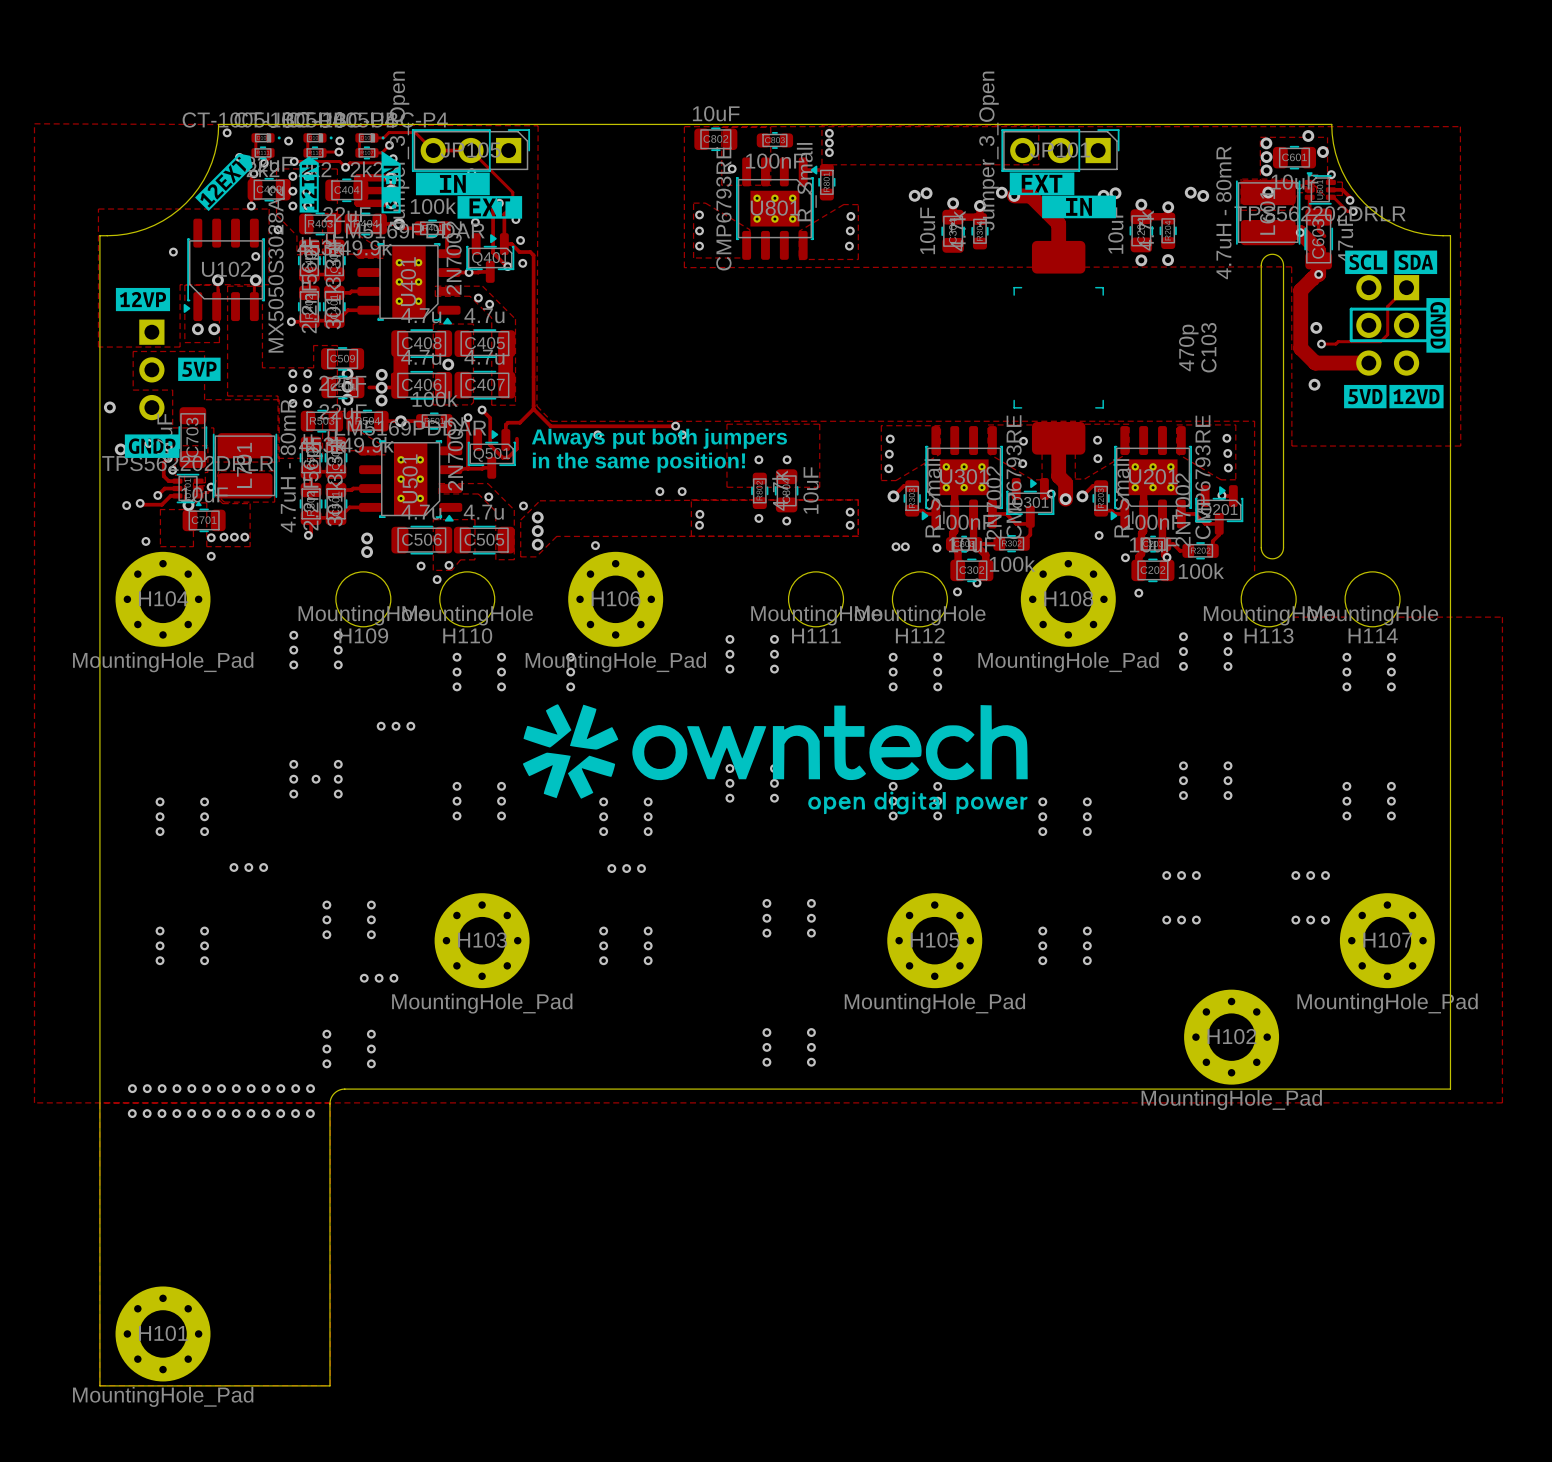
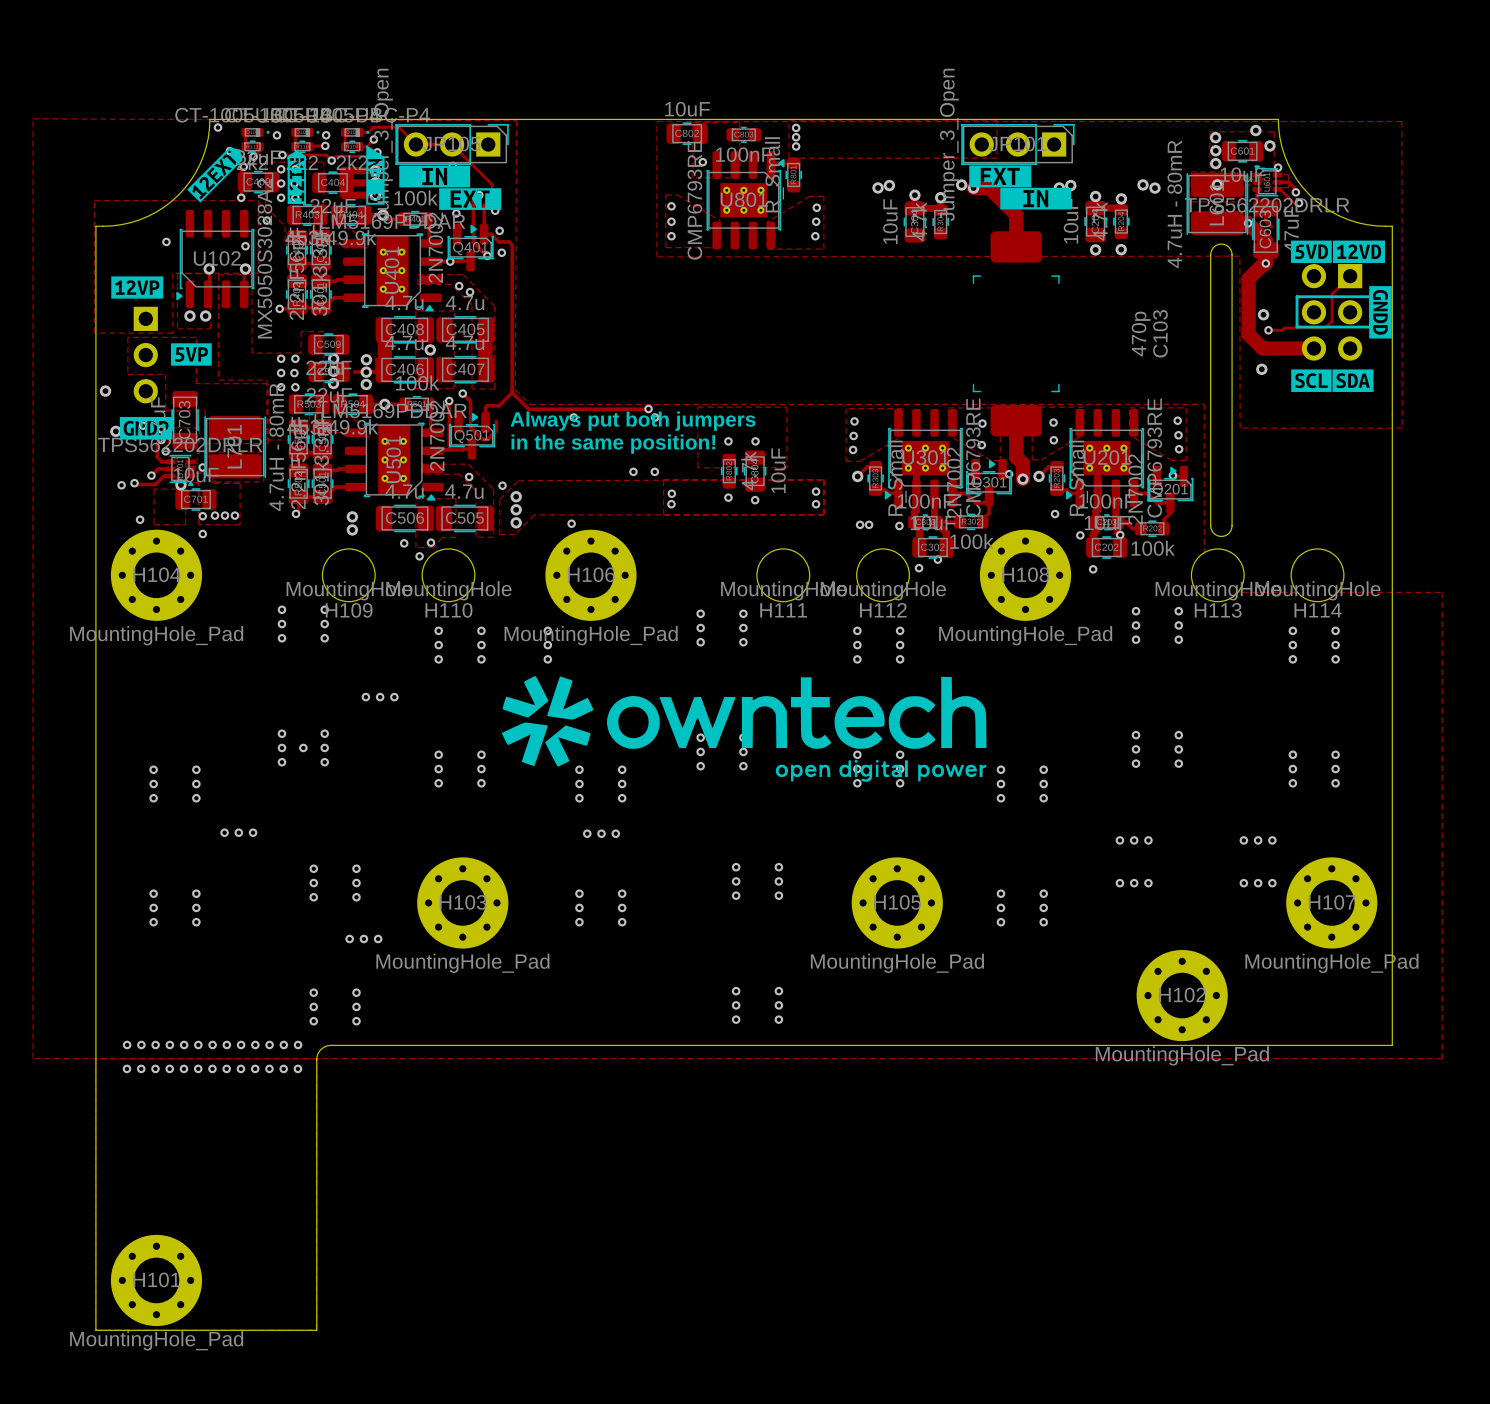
drawing position: (1366, 262) -> (1311, 380)
drawing position: (1415, 262) -> (1353, 380)
drawing position: (1365, 396) -> (1311, 251)
drawing position: (1416, 396) -> (1358, 251)

